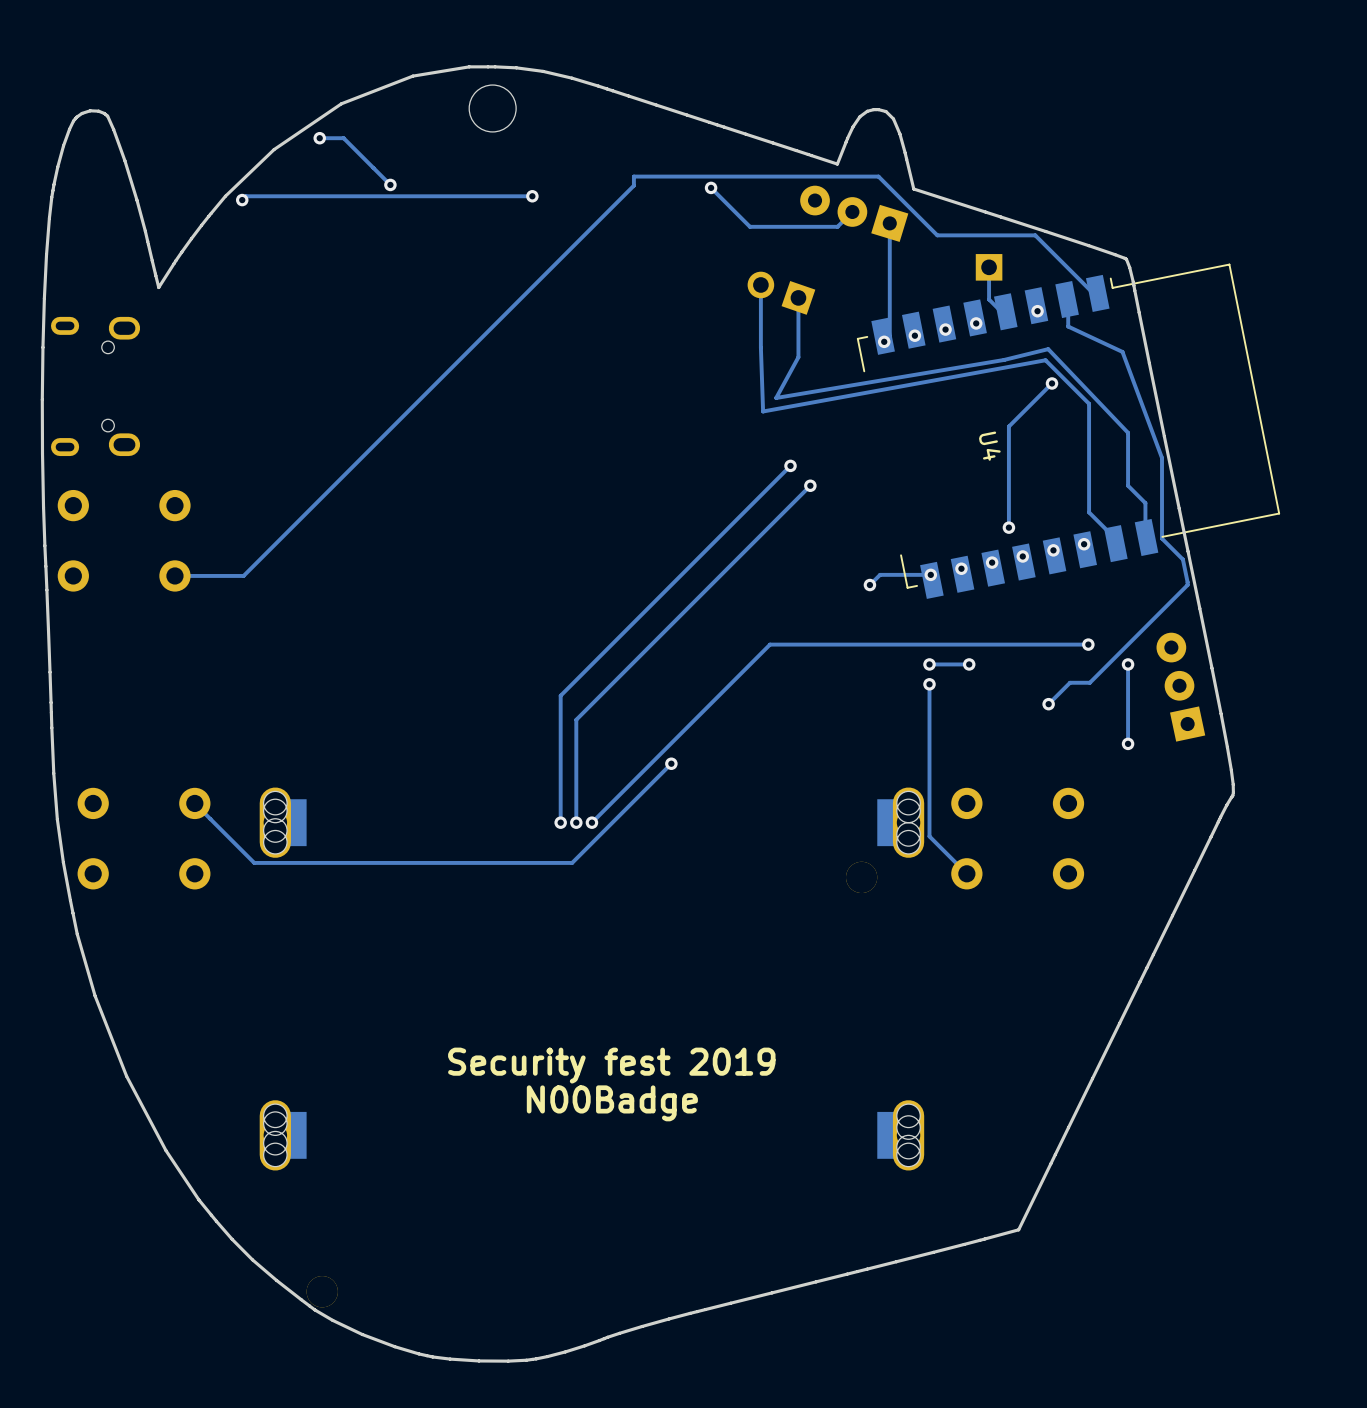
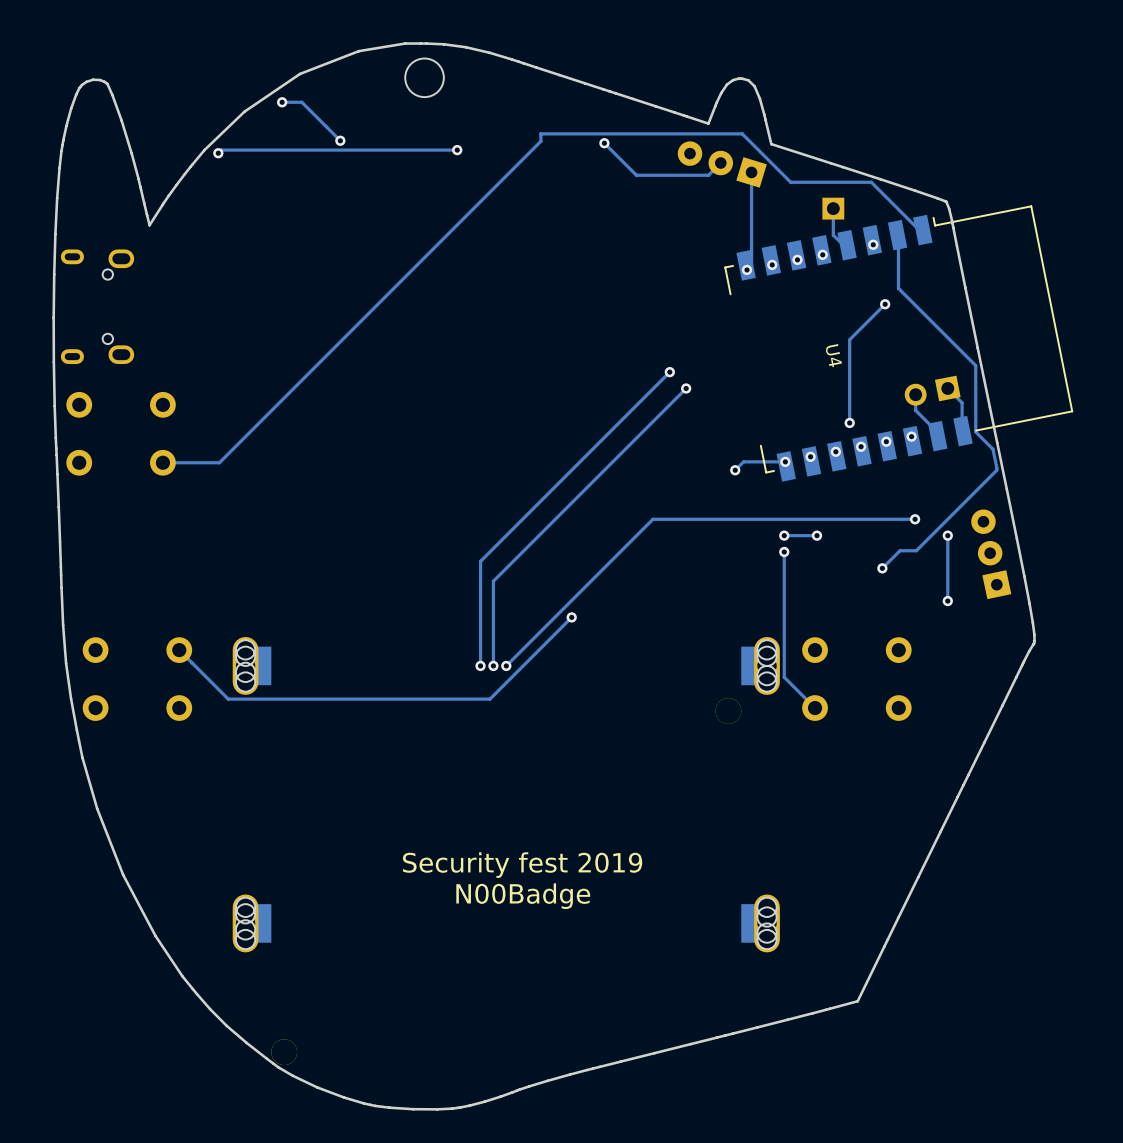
track: (760, 284) (763, 411) (1045, 360) (1089, 403) (1089, 493) -> none
part: (781, 293) -> none
track: (798, 297) (798, 357) (776, 397) (1004, 359) (1048, 349) (1128, 432) (1128, 485) -> none
track: (1068, 326) (1122, 351) (1162, 458) -> (898, 257) (898, 288) (975, 365)
part: none -> (932, 390)

